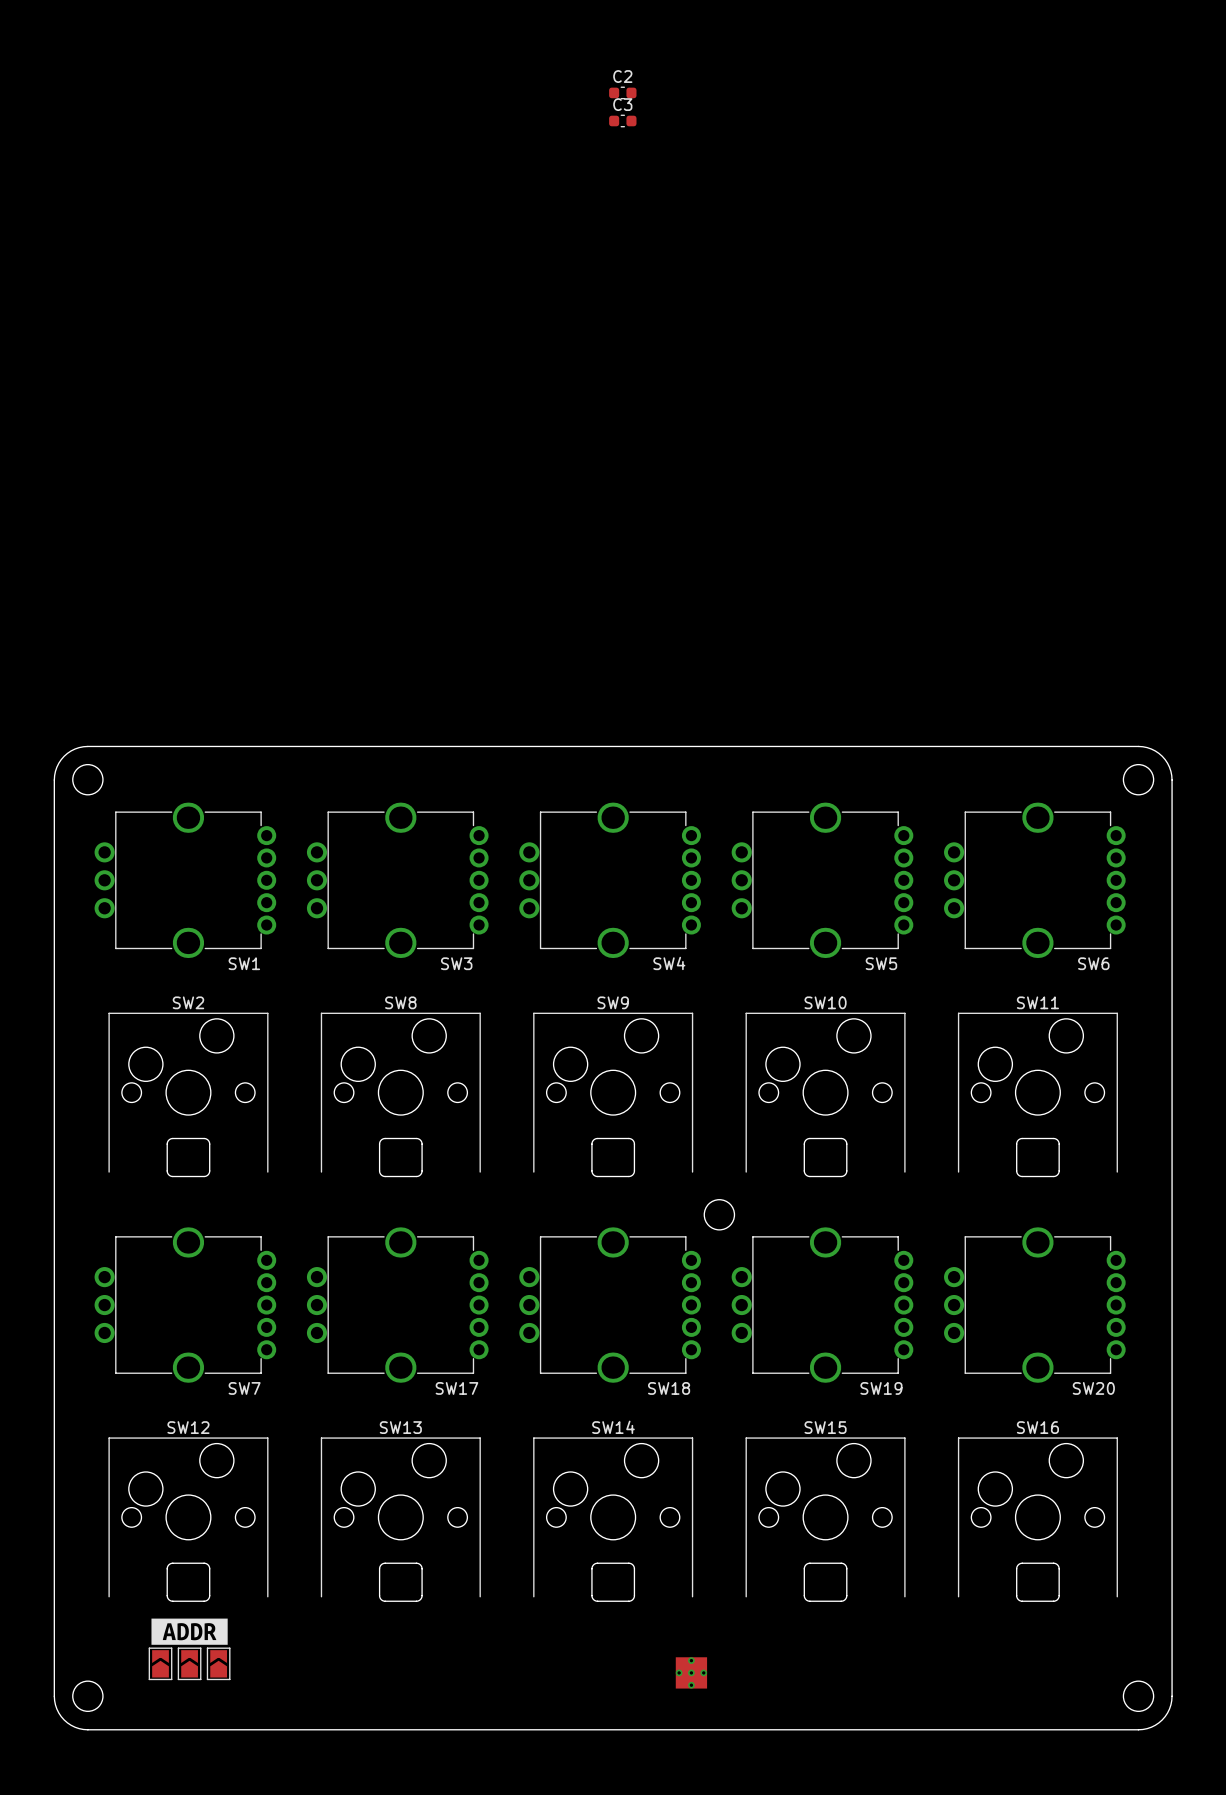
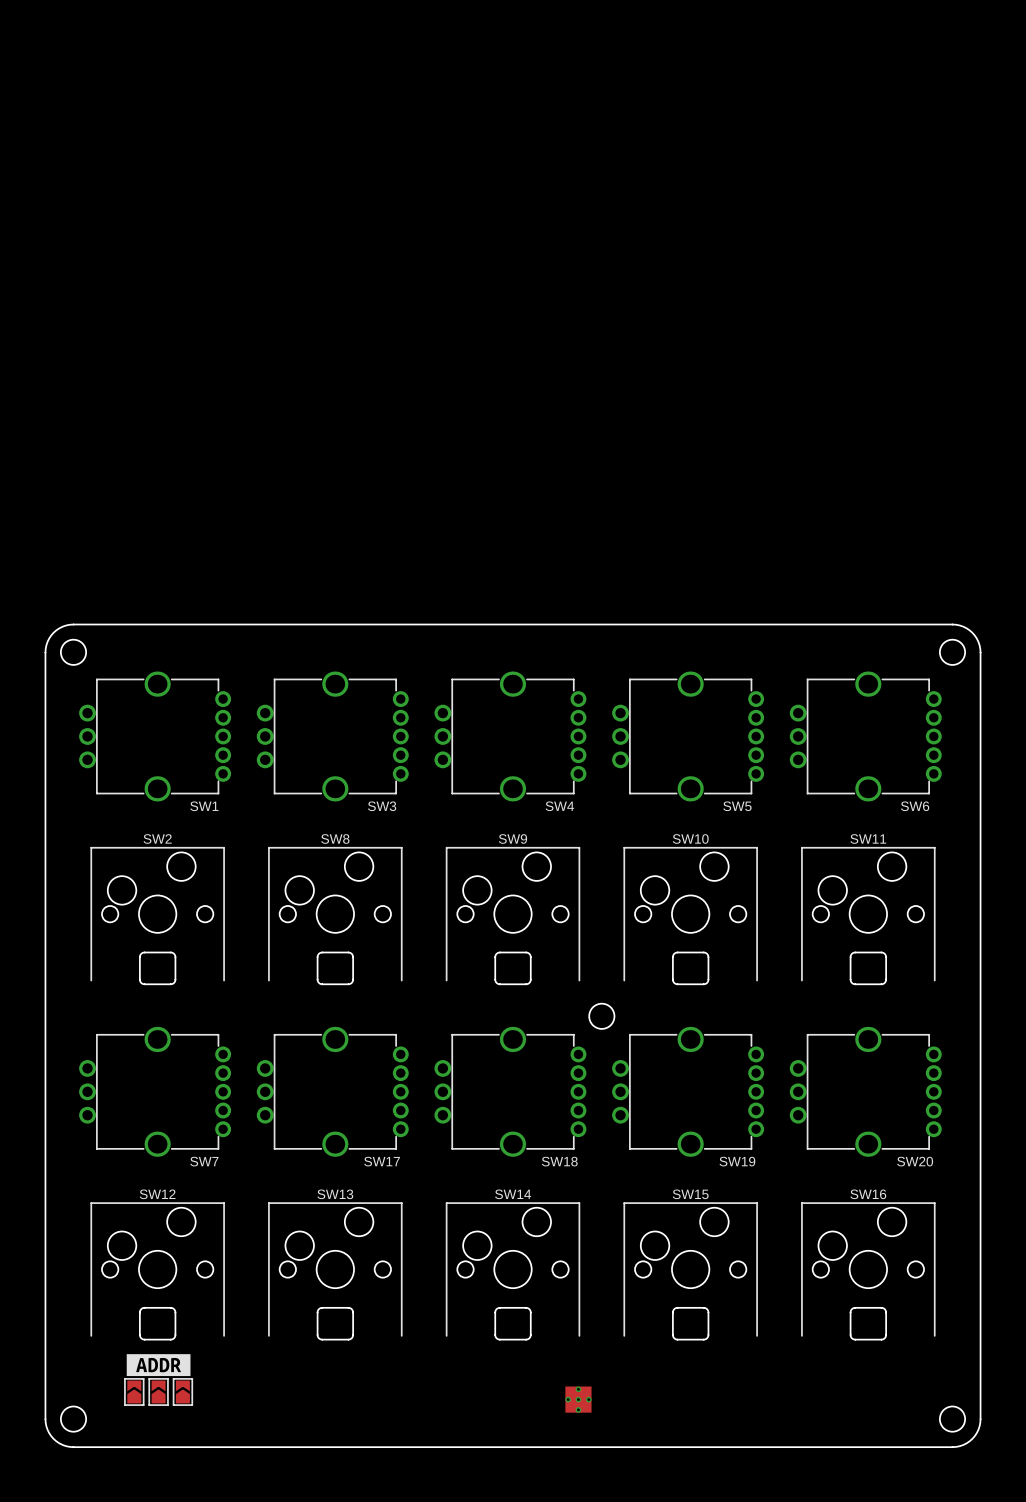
C2: (622, 92) -> none
C3: (622, 120) -> none

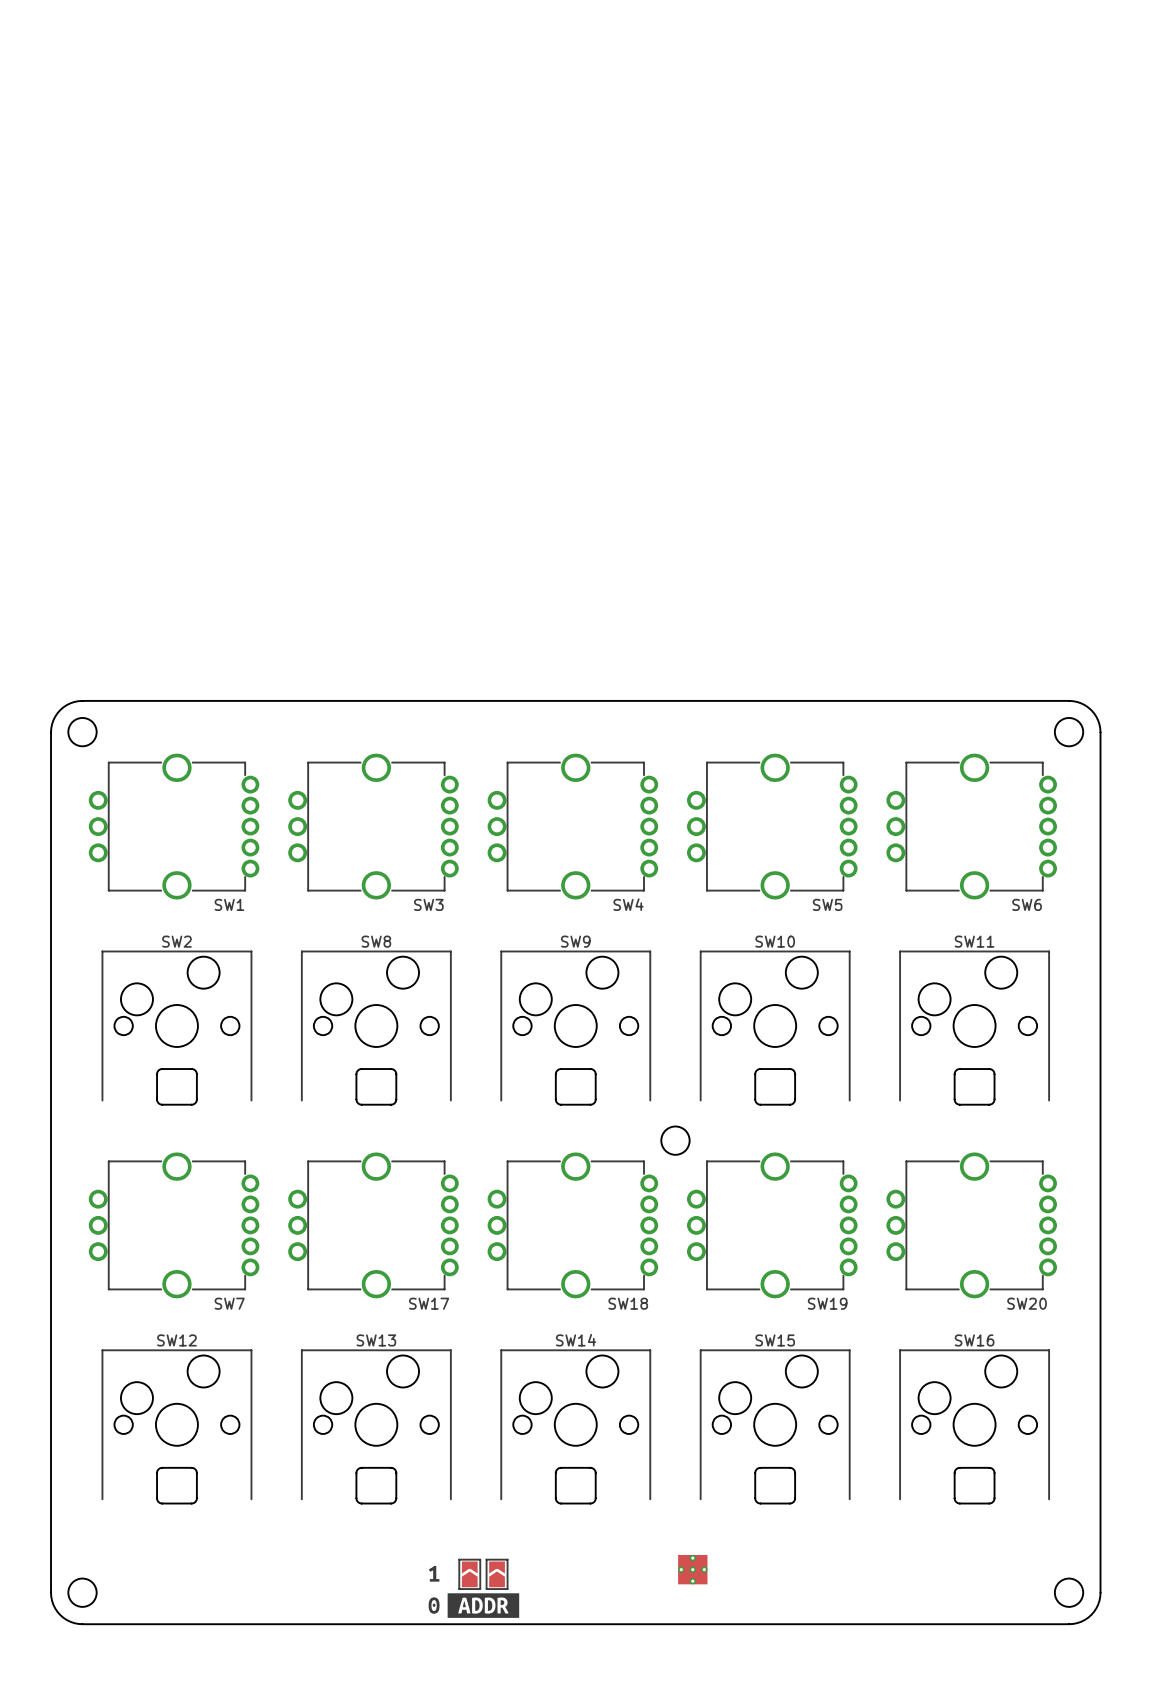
drawing: [126, 1354, 191, 1377] -> none
part: (134, 1391) -> none
part: (158, 1391) -> none
part: (182, 1391) -> none
drawing: none -> [428, 1565, 520, 1618]
part position: (578, 1399) -> (692, 1569)
part: none -> (469, 1574)
part: none -> (497, 1574)

